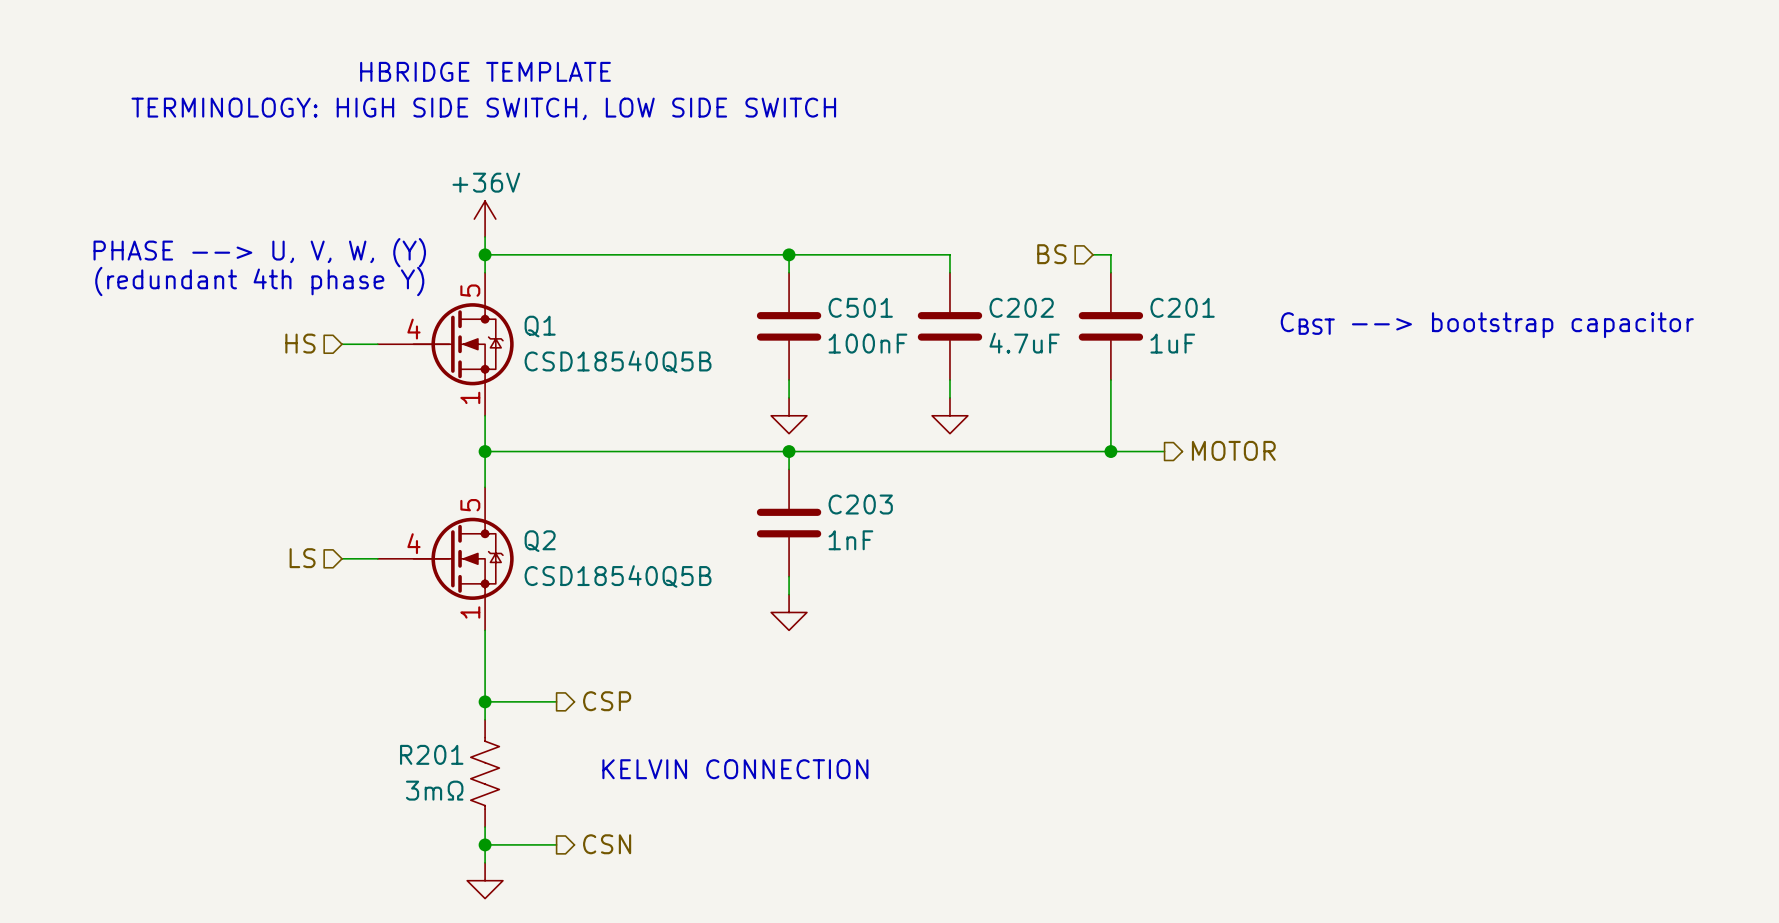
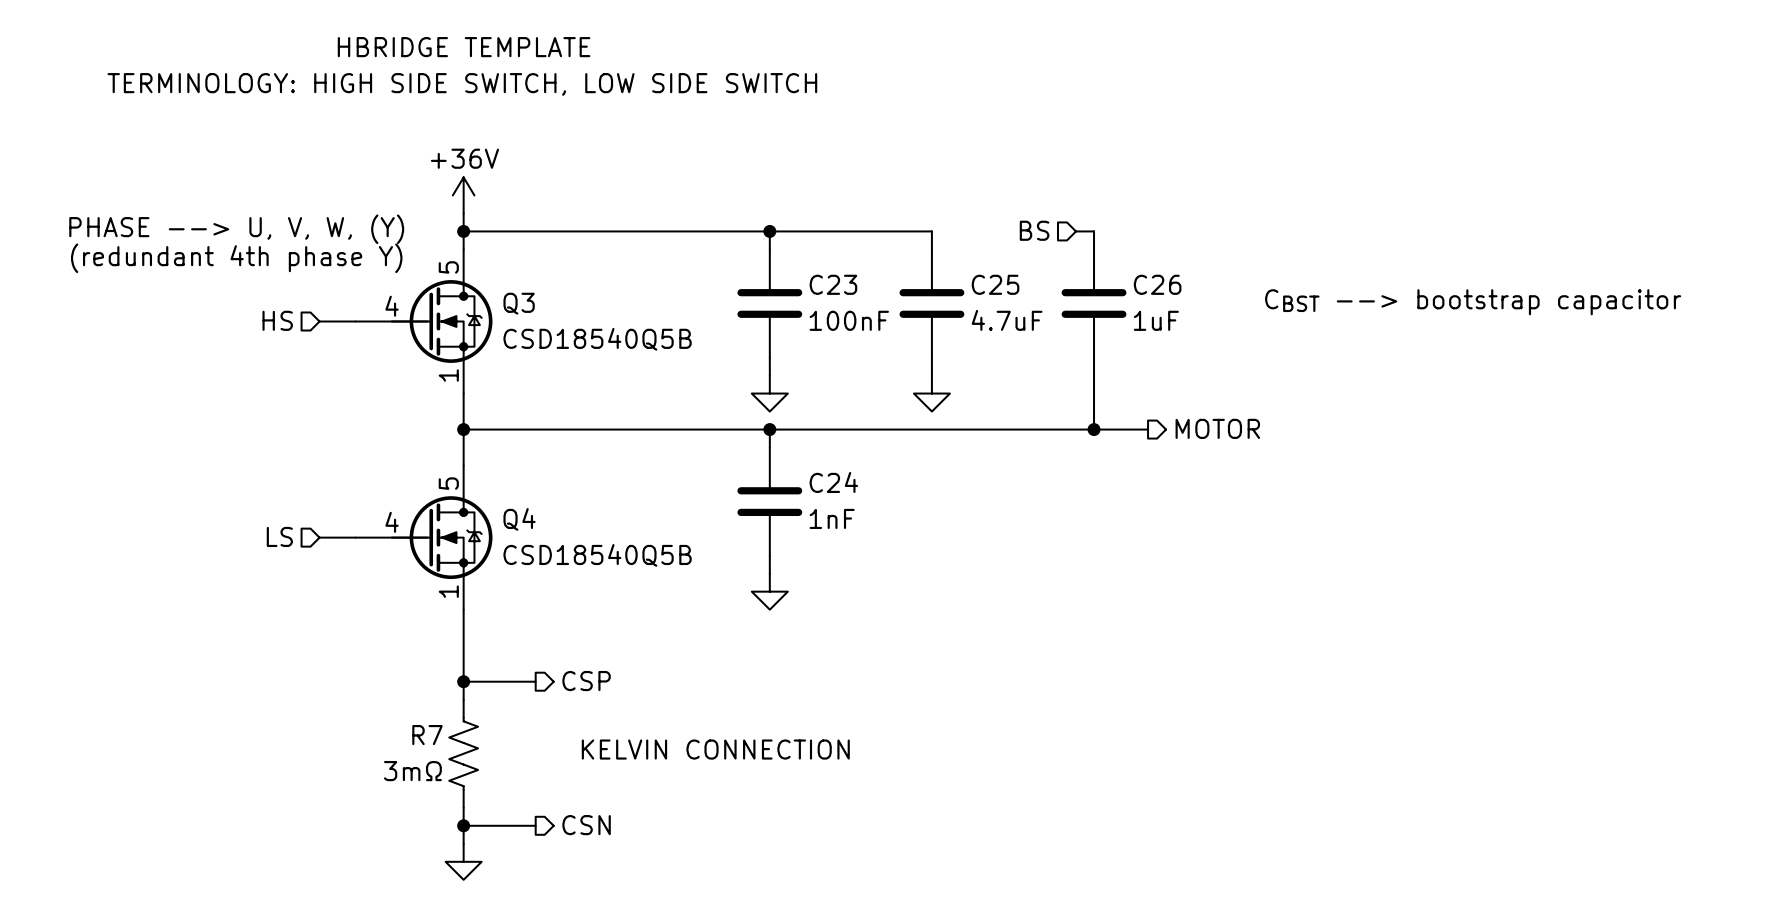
C501 name: C501 (860, 307) -> C23 (833, 284)
C202 name: C202 (1021, 307) -> C25 (995, 284)
C201 name: C201 (1182, 307) -> C26 (1157, 284)
Q1 name: Q1 (540, 326) -> Q3 (519, 303)
C203 name: C203 (860, 504) -> C24 (833, 482)
Q2 name: Q2 (540, 541) -> Q4 (519, 519)
R201 name: R201 (431, 754) -> R7 (427, 735)

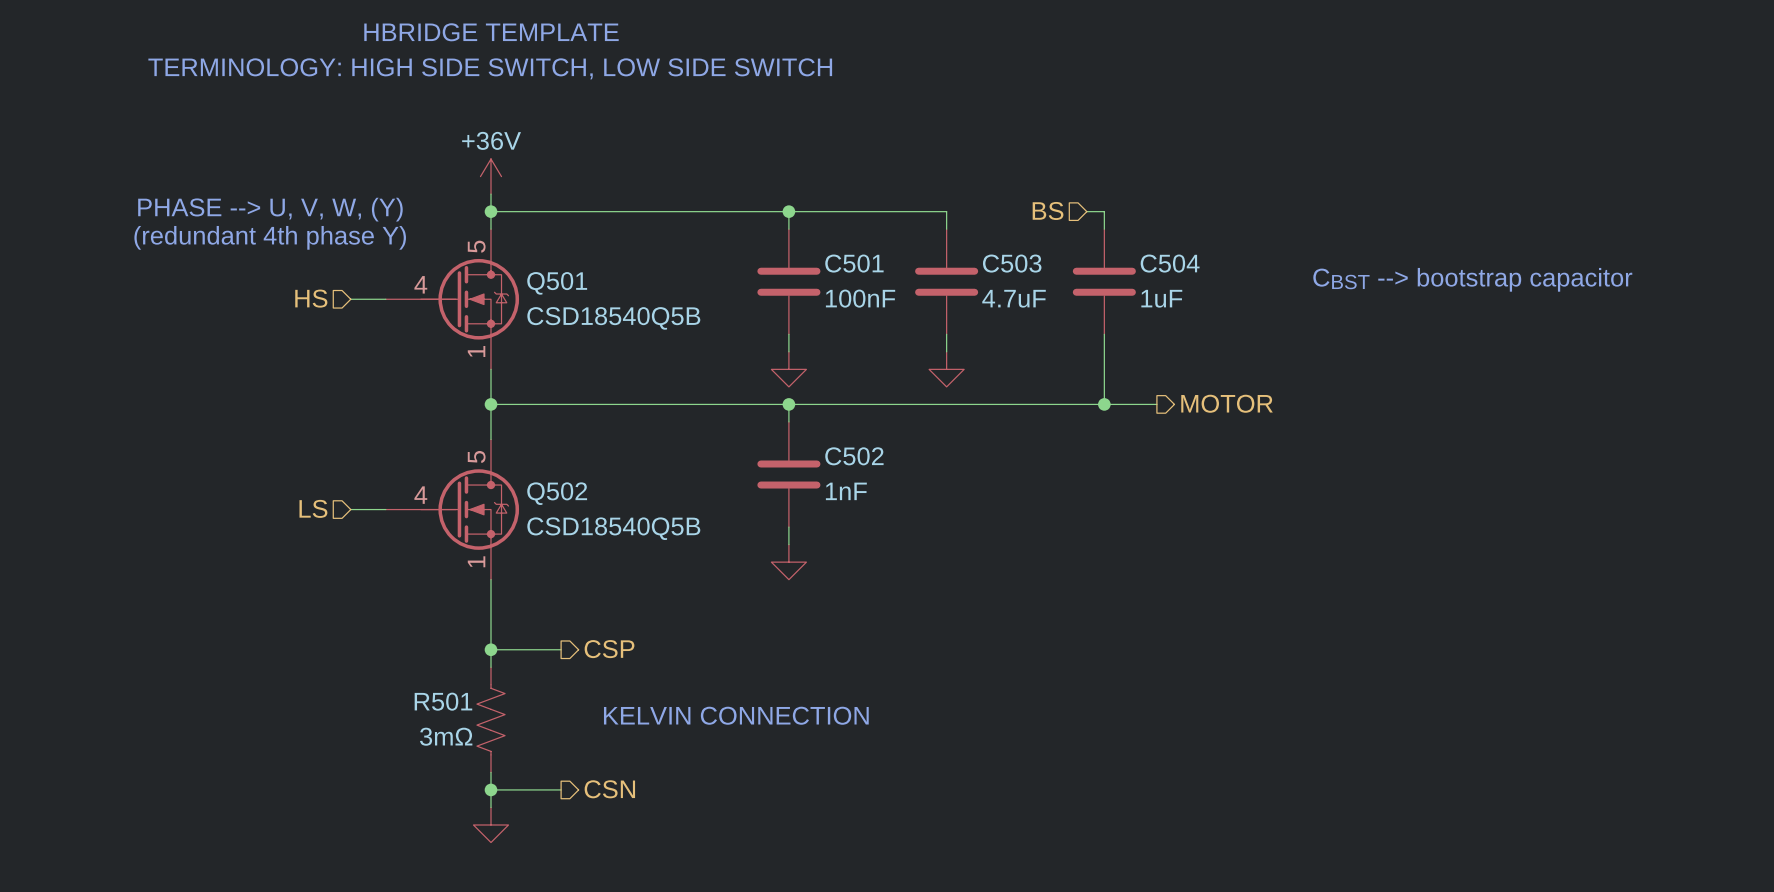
C23 name: C23 (833, 284) -> C501 (854, 263)
C25 name: C25 (995, 284) -> C503 (1012, 263)
C26 name: C26 (1157, 284) -> C504 (1170, 263)
Q3 name: Q3 (519, 303) -> Q501 (557, 283)
C24 name: C24 (833, 482) -> C502 (854, 456)
Q4 name: Q4 (519, 519) -> Q502 (557, 493)
R7 name: R7 (427, 735) -> R501 (443, 701)

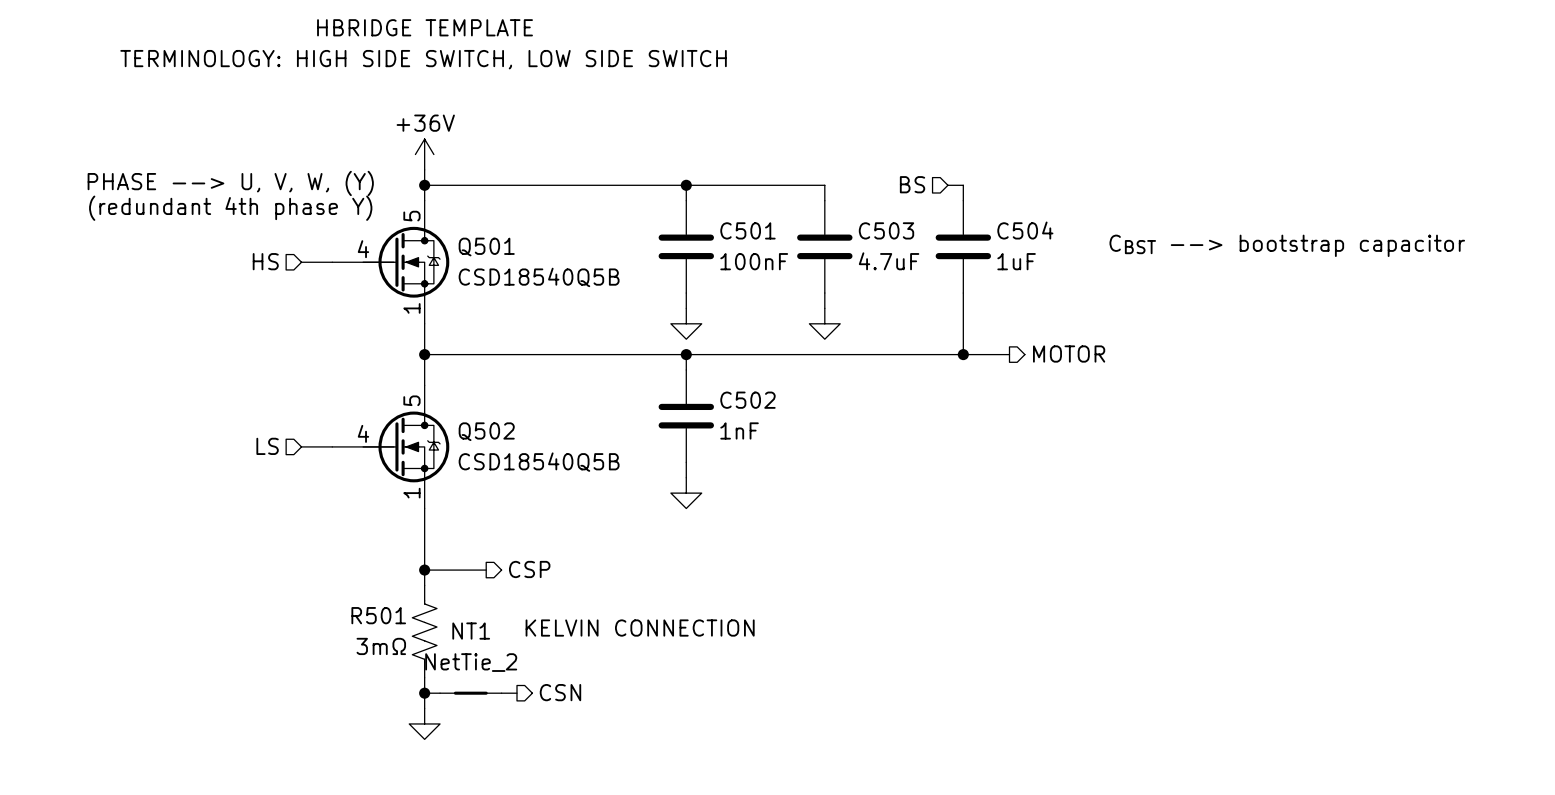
NT1: none -> NetTie_2 (470, 693)
wire: none -> (501, 693) (517, 693)
hierarchical label position: CSN (609, 789) -> CSN (560, 692)

